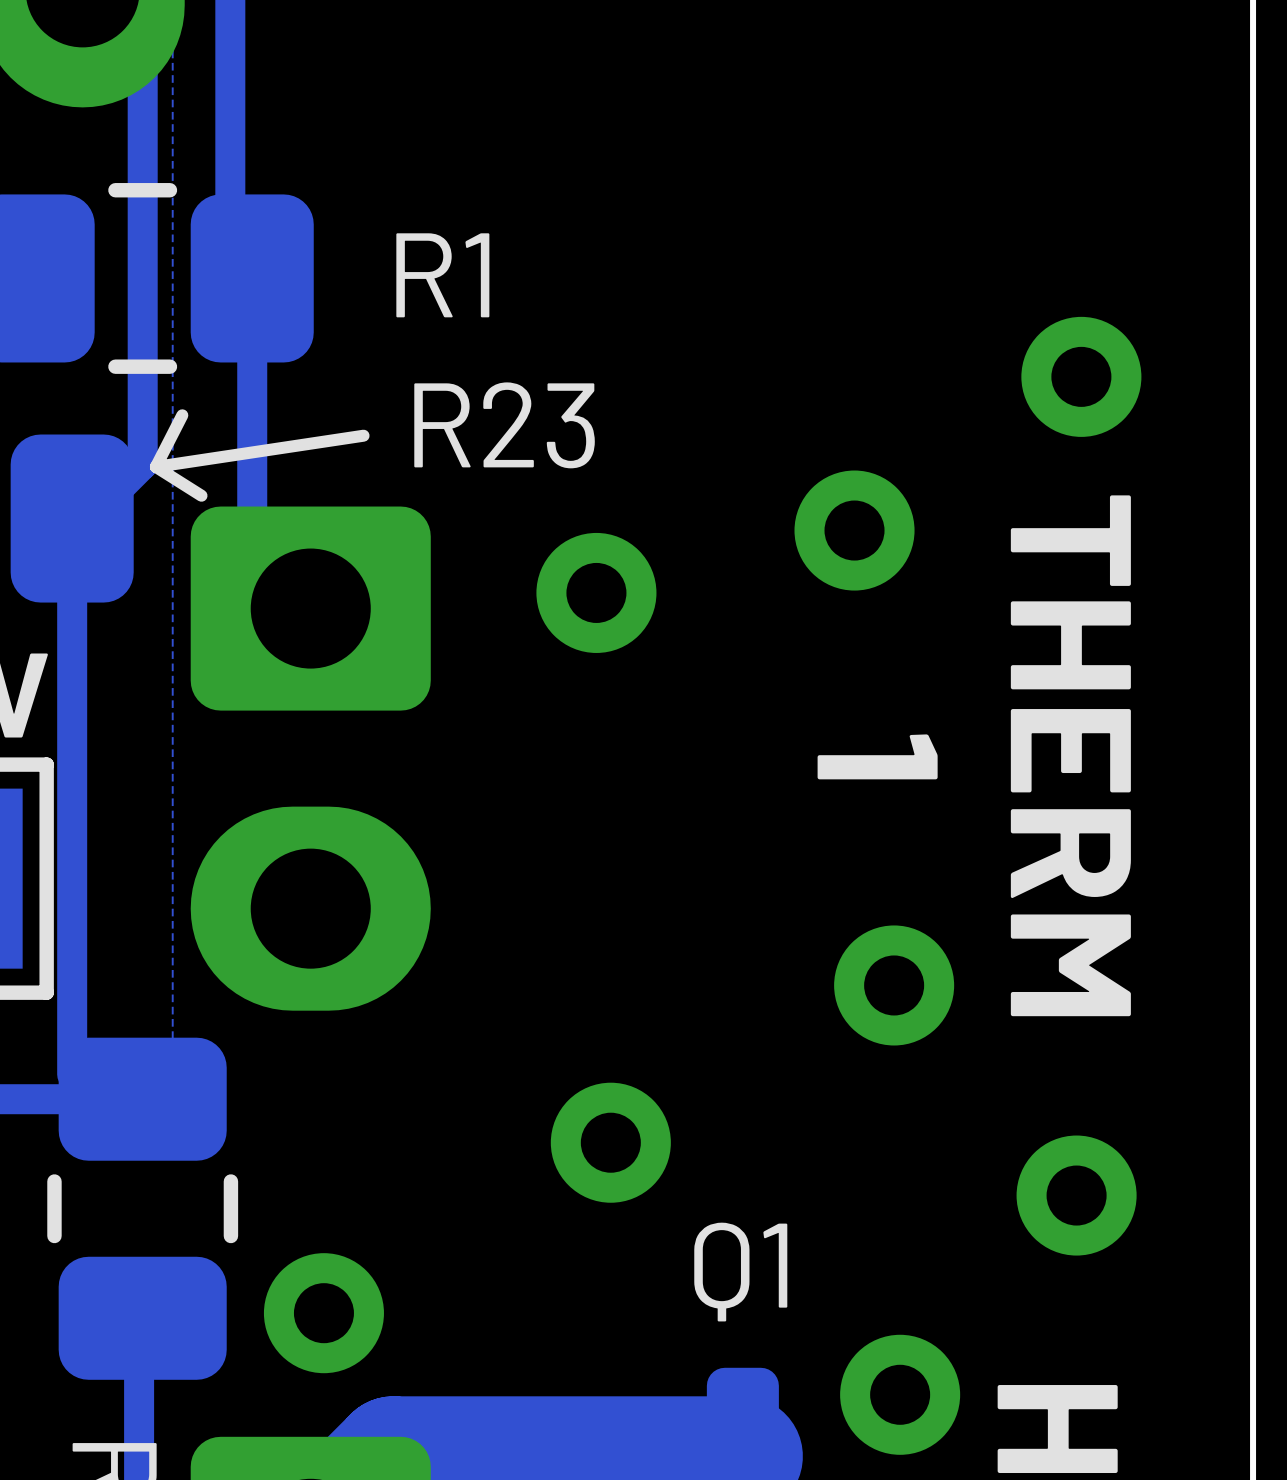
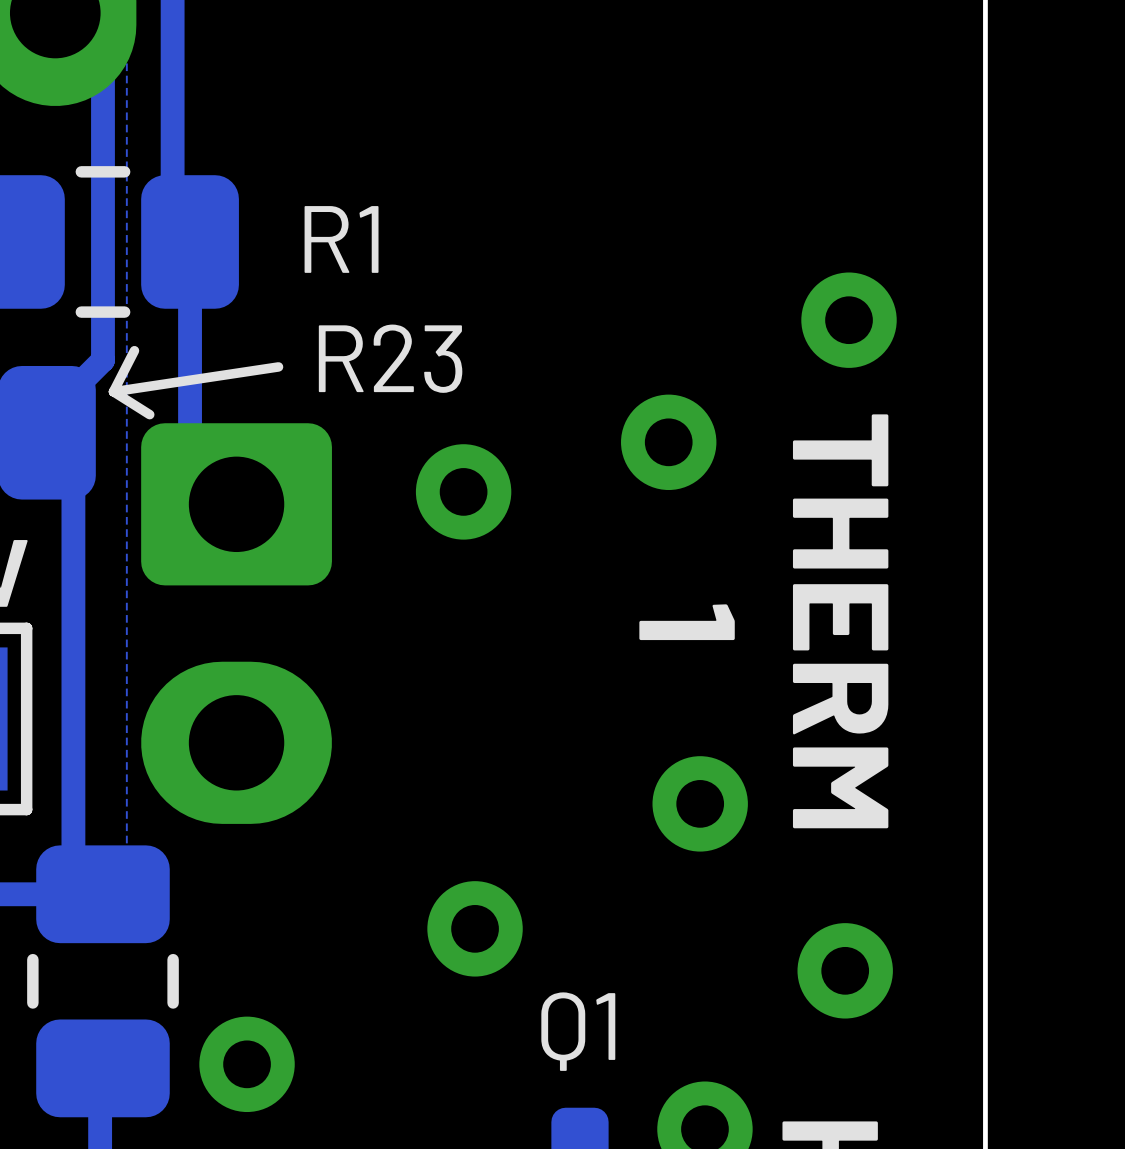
bottom track: (142, 427) (142, 464) (88, 518) (72, 518) (72, 1074) -> (102, 360) (46, 416) (46, 432) (73, 459) (73, 848)

